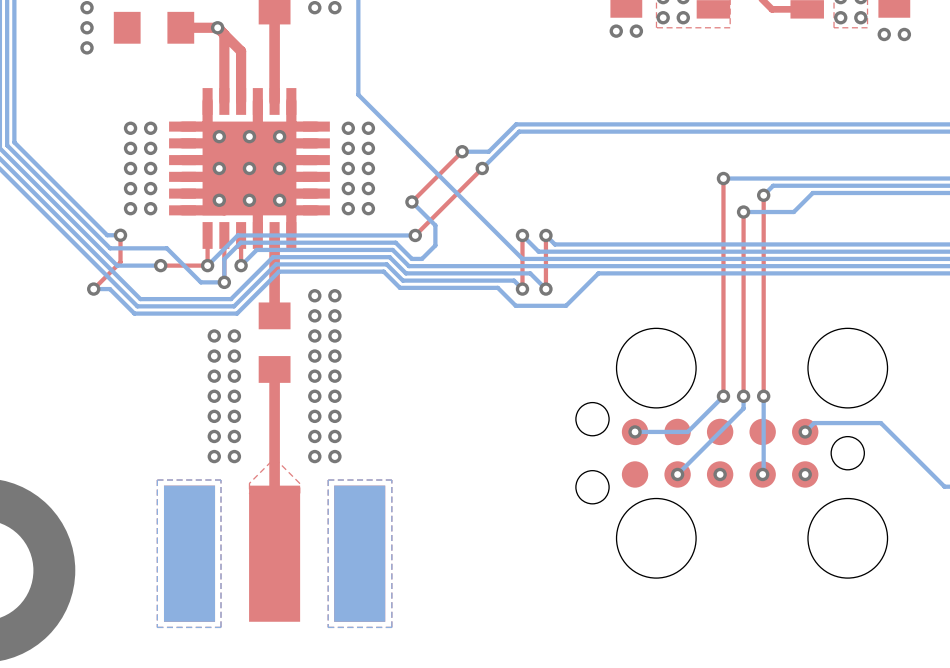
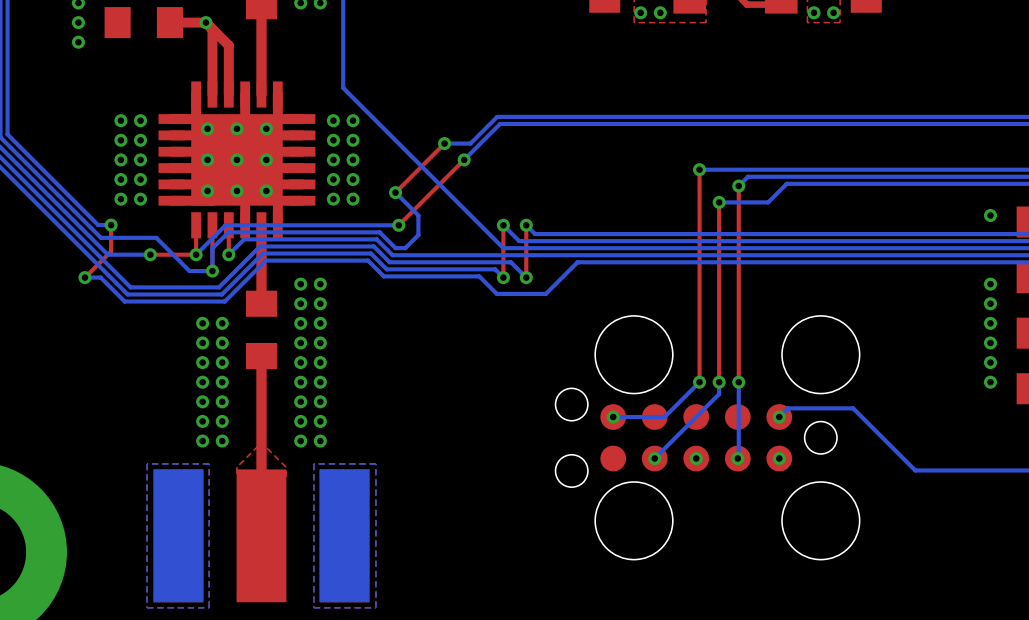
via: (616, 31) -> none
via: (636, 31) -> none
via: (884, 34) -> none
via: (904, 34) -> none

